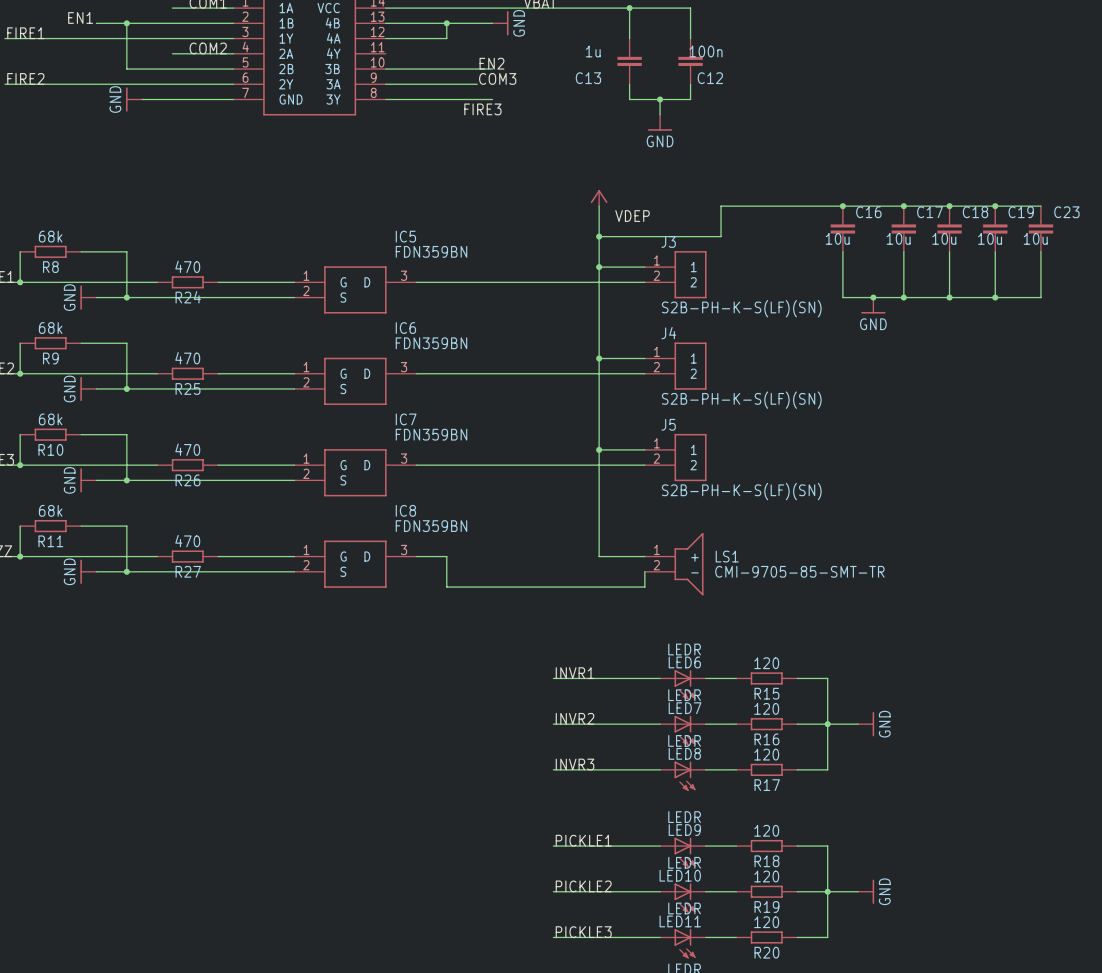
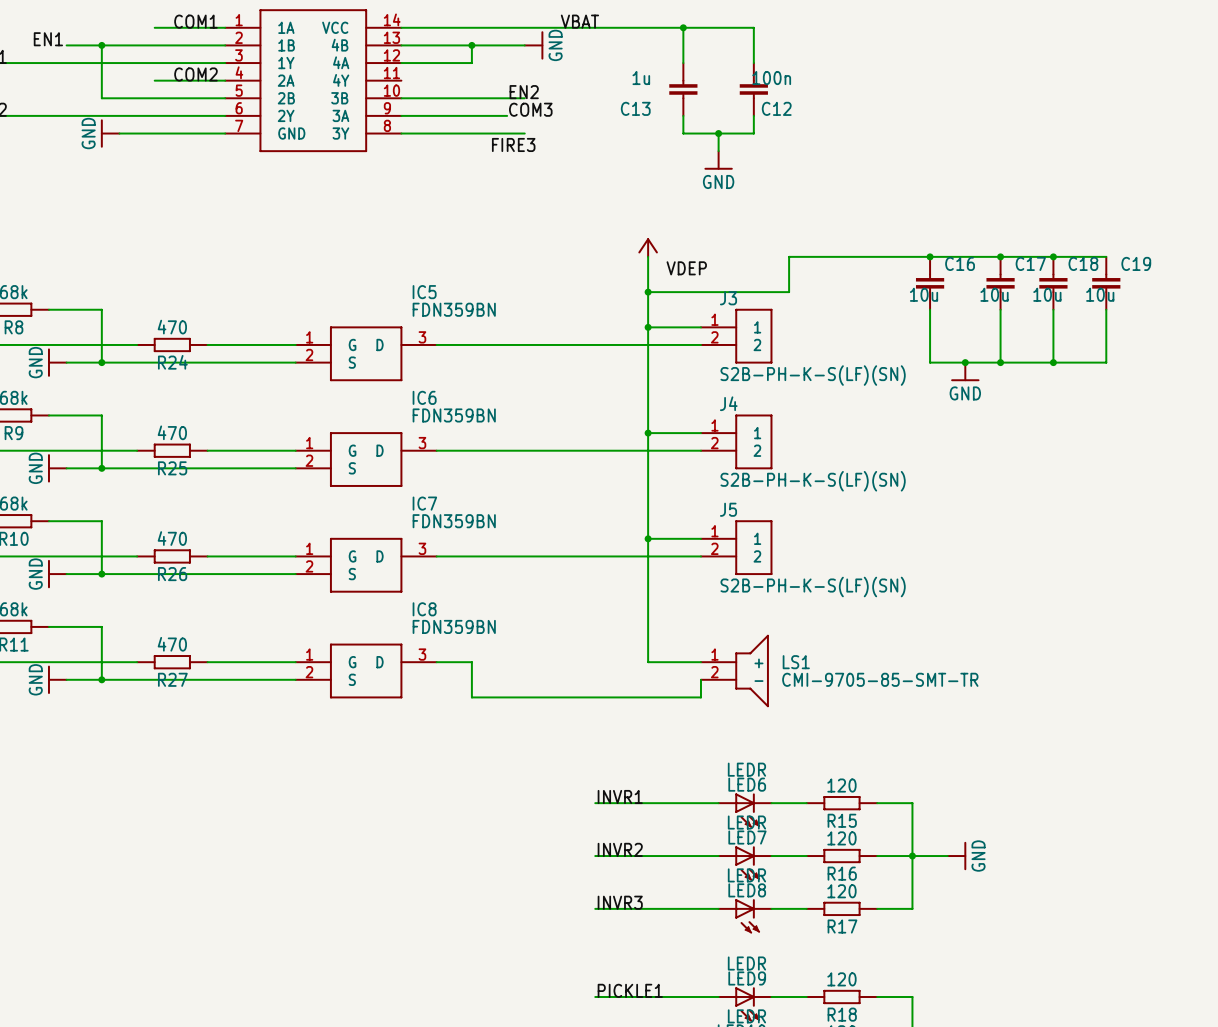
wire: (995, 206) (1040, 206) -> none
junction: (995, 206) -> none
C23: 10u (1040, 229) -> none
wire: (1040, 251) (1040, 297) (995, 297) -> none
junction: (995, 297) -> none

